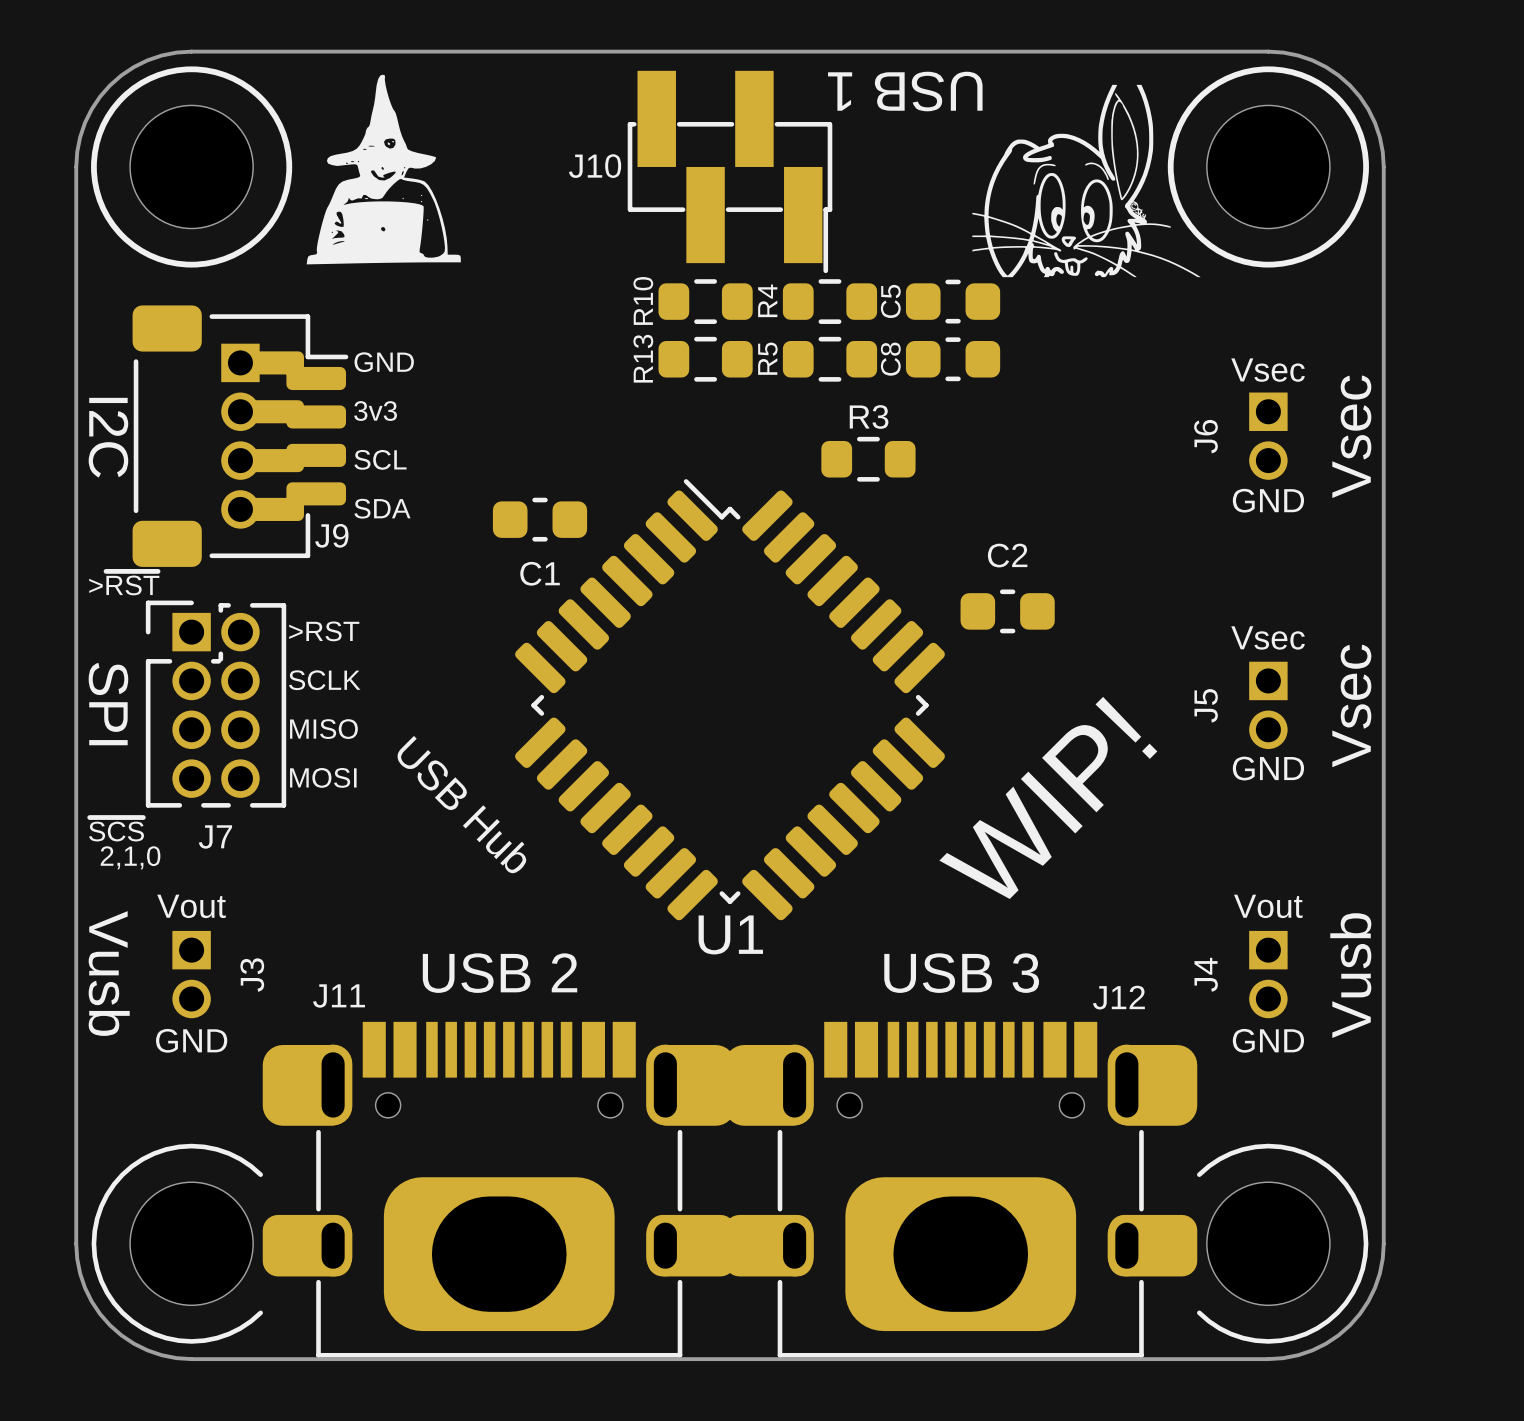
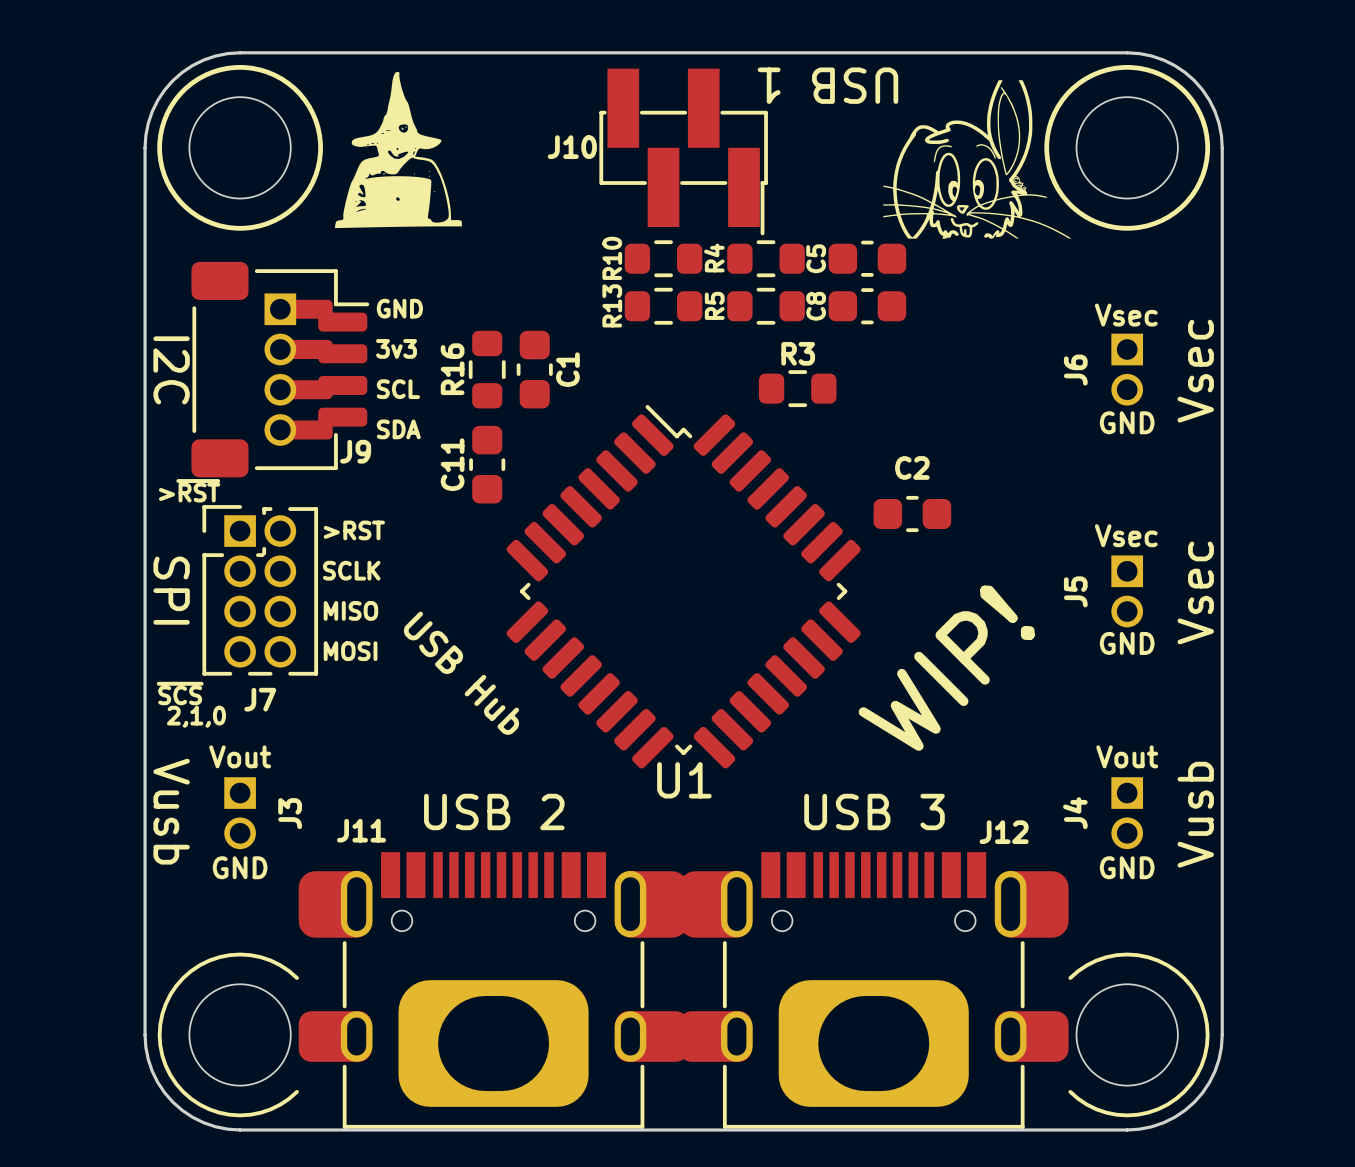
R16: none -> (487, 369)
C1 rotation: 0° (540, 519) -> 90° clockwise (534, 369)
C1 position: (540, 519) -> (534, 369)
C11: none -> (487, 464)

